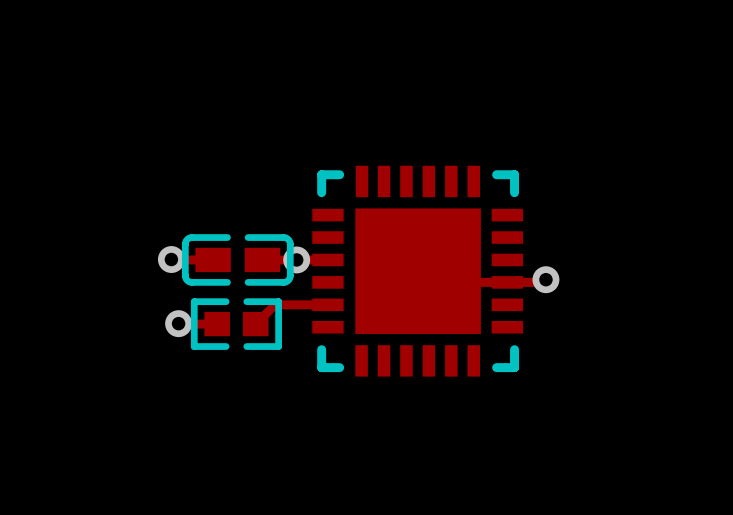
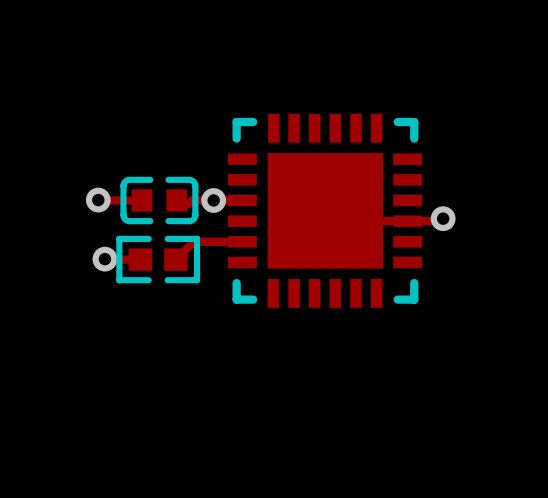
part footprint: [181, 234, 294, 286] -> [120, 176, 199, 225]

